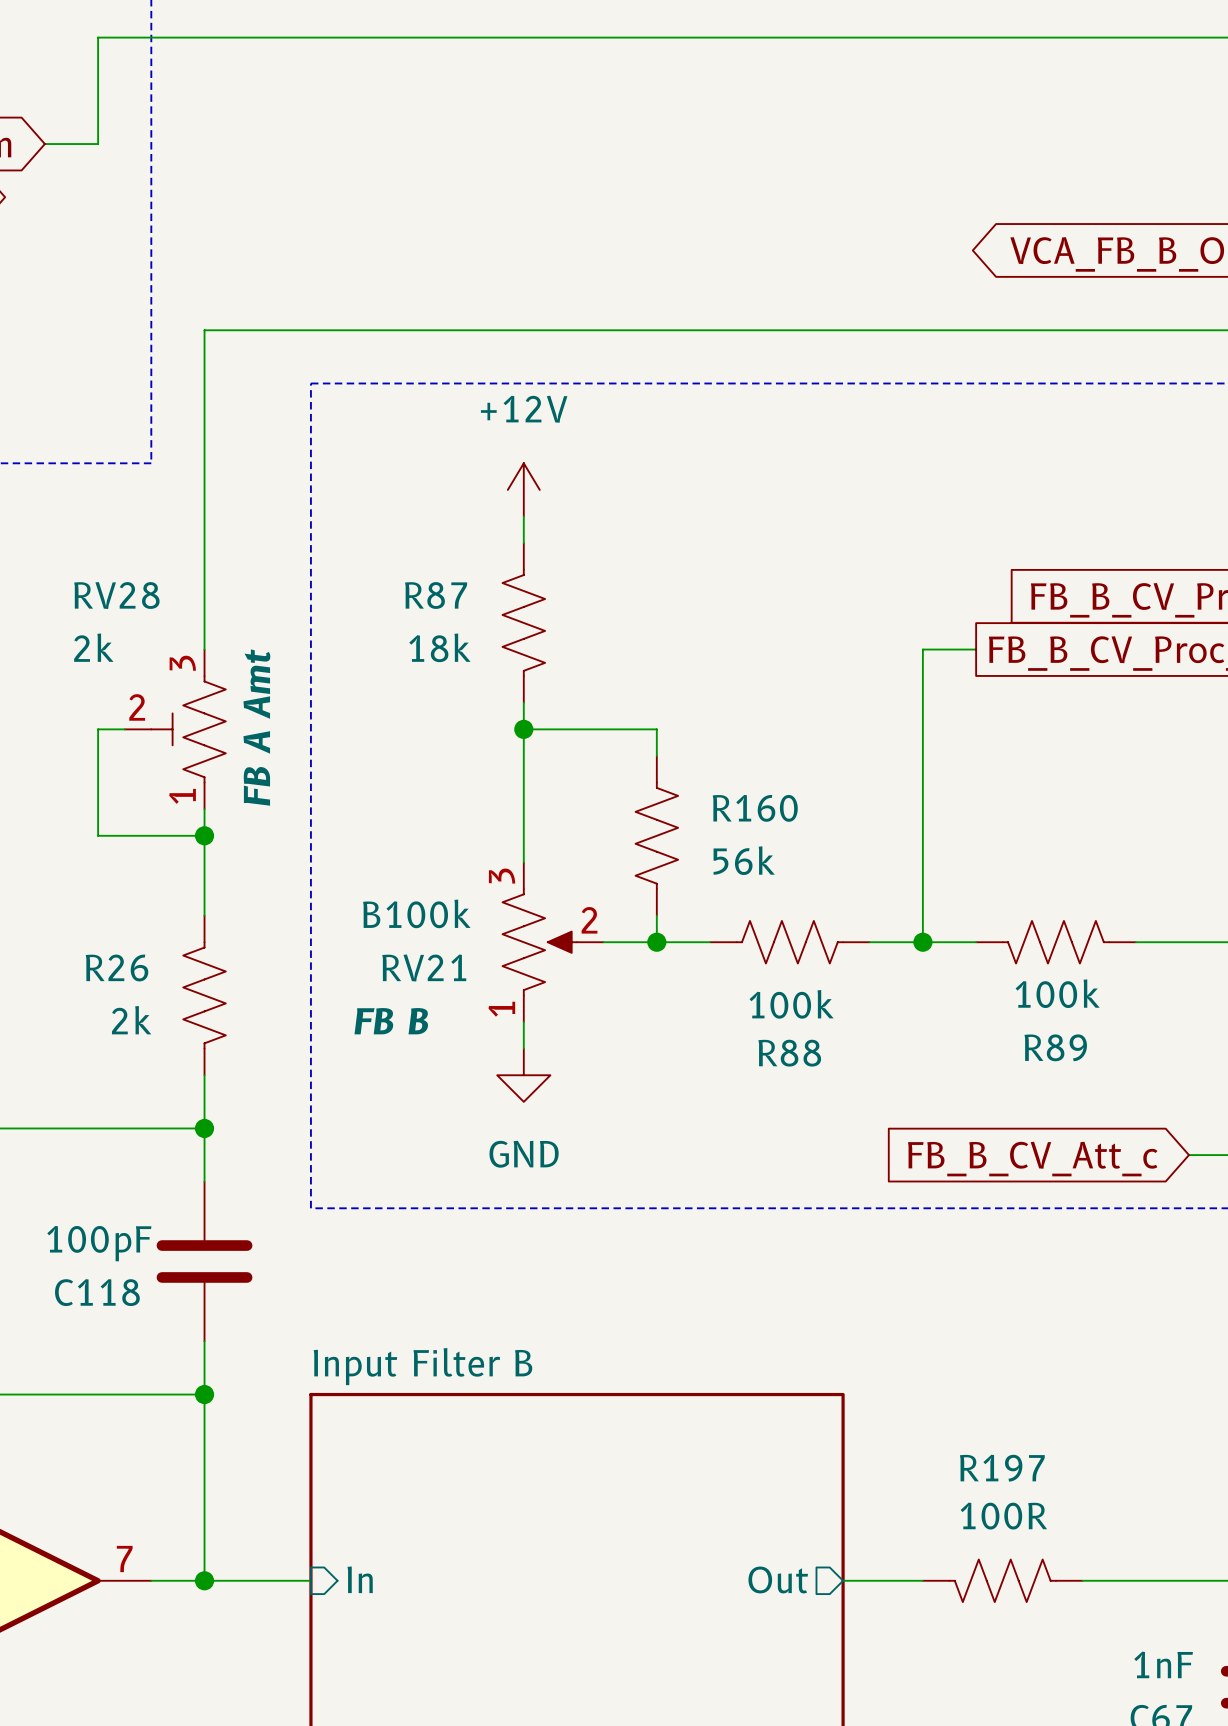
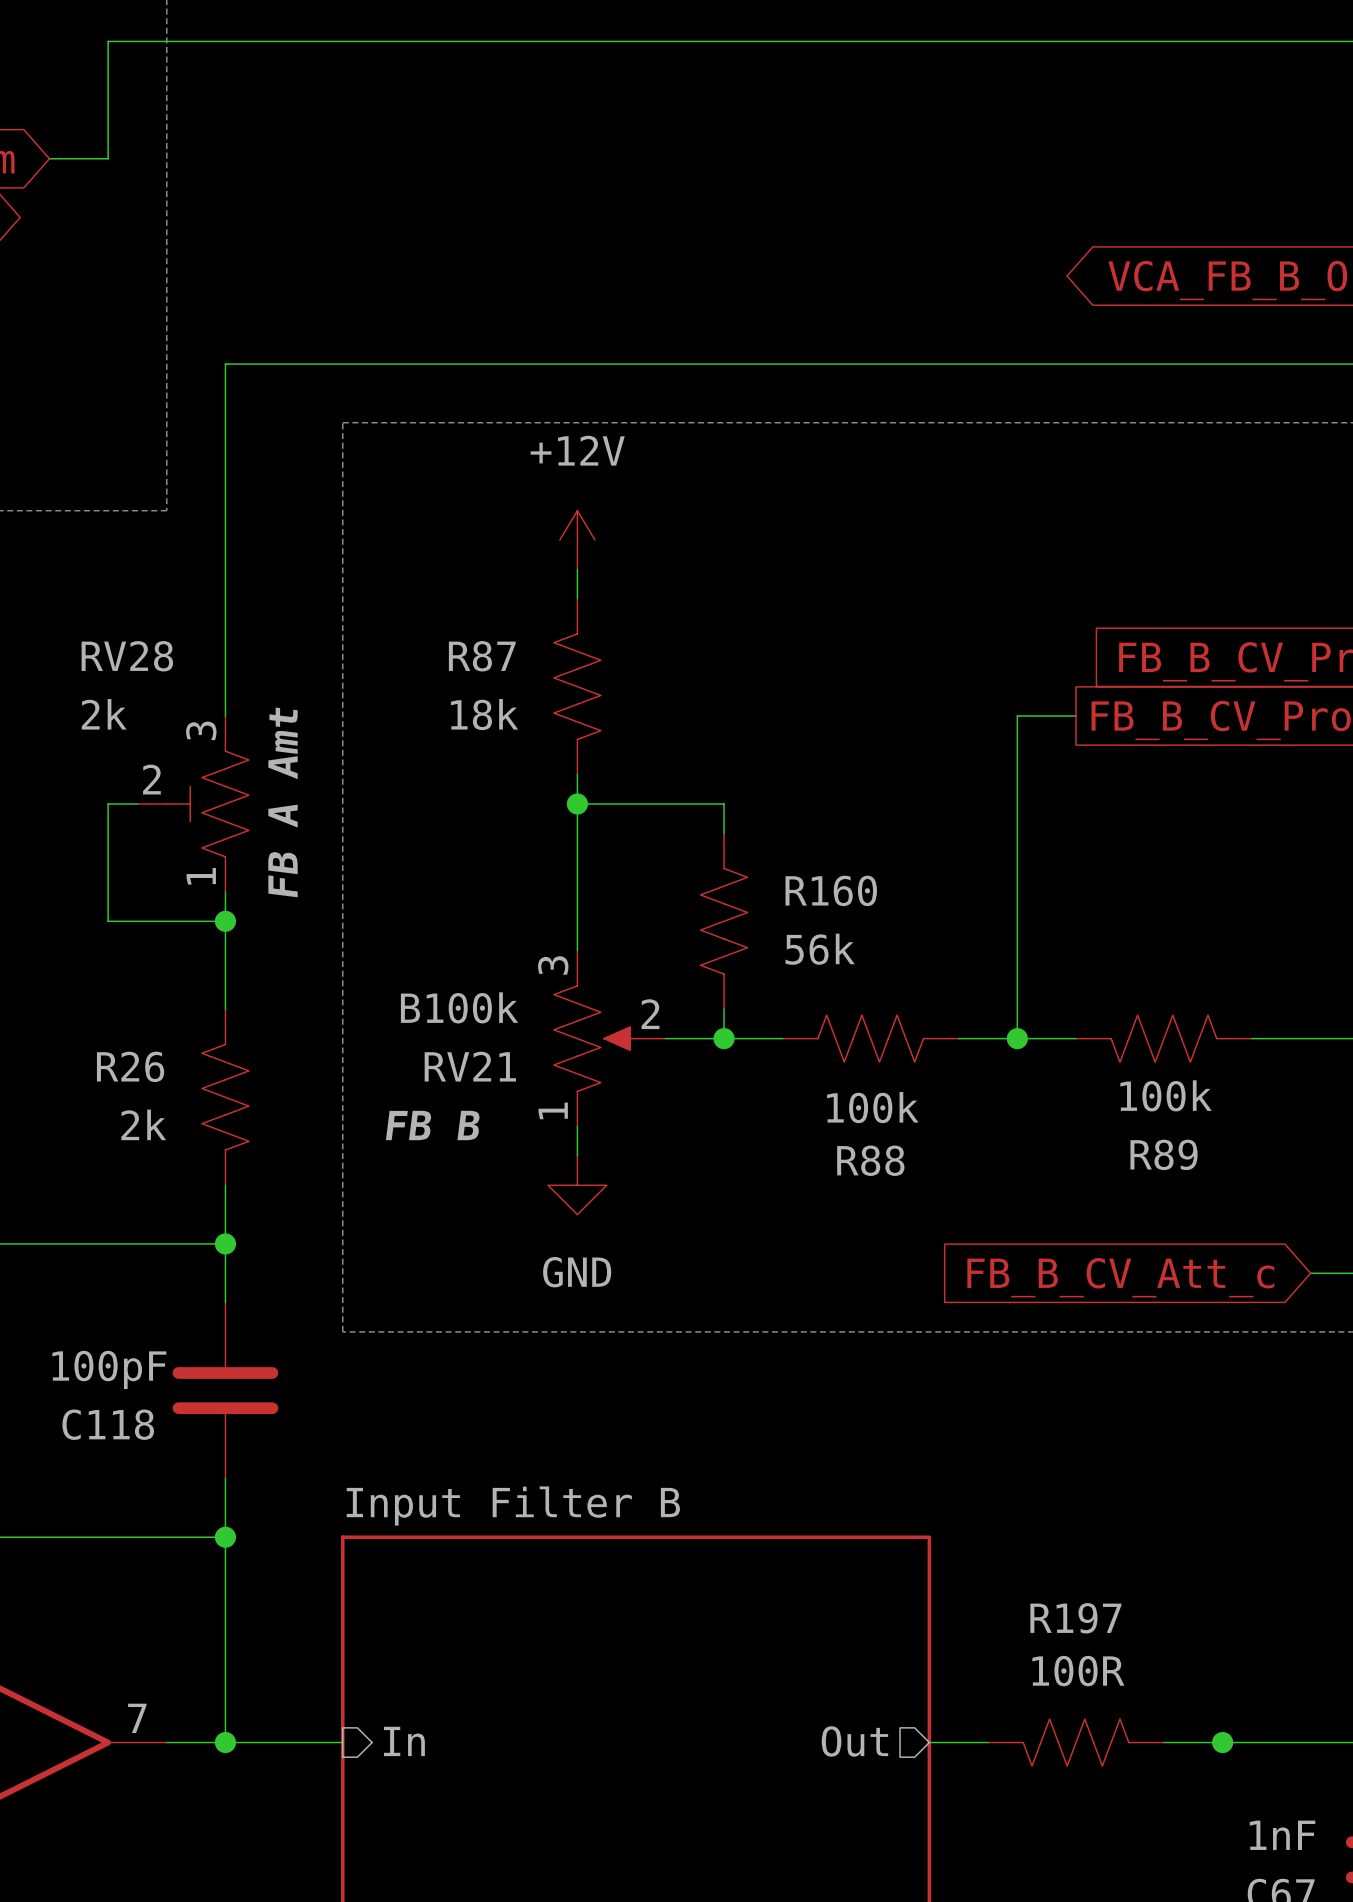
R197 position: (1002, 1580) -> (1076, 1742)
junction: none -> (1222, 1742)

